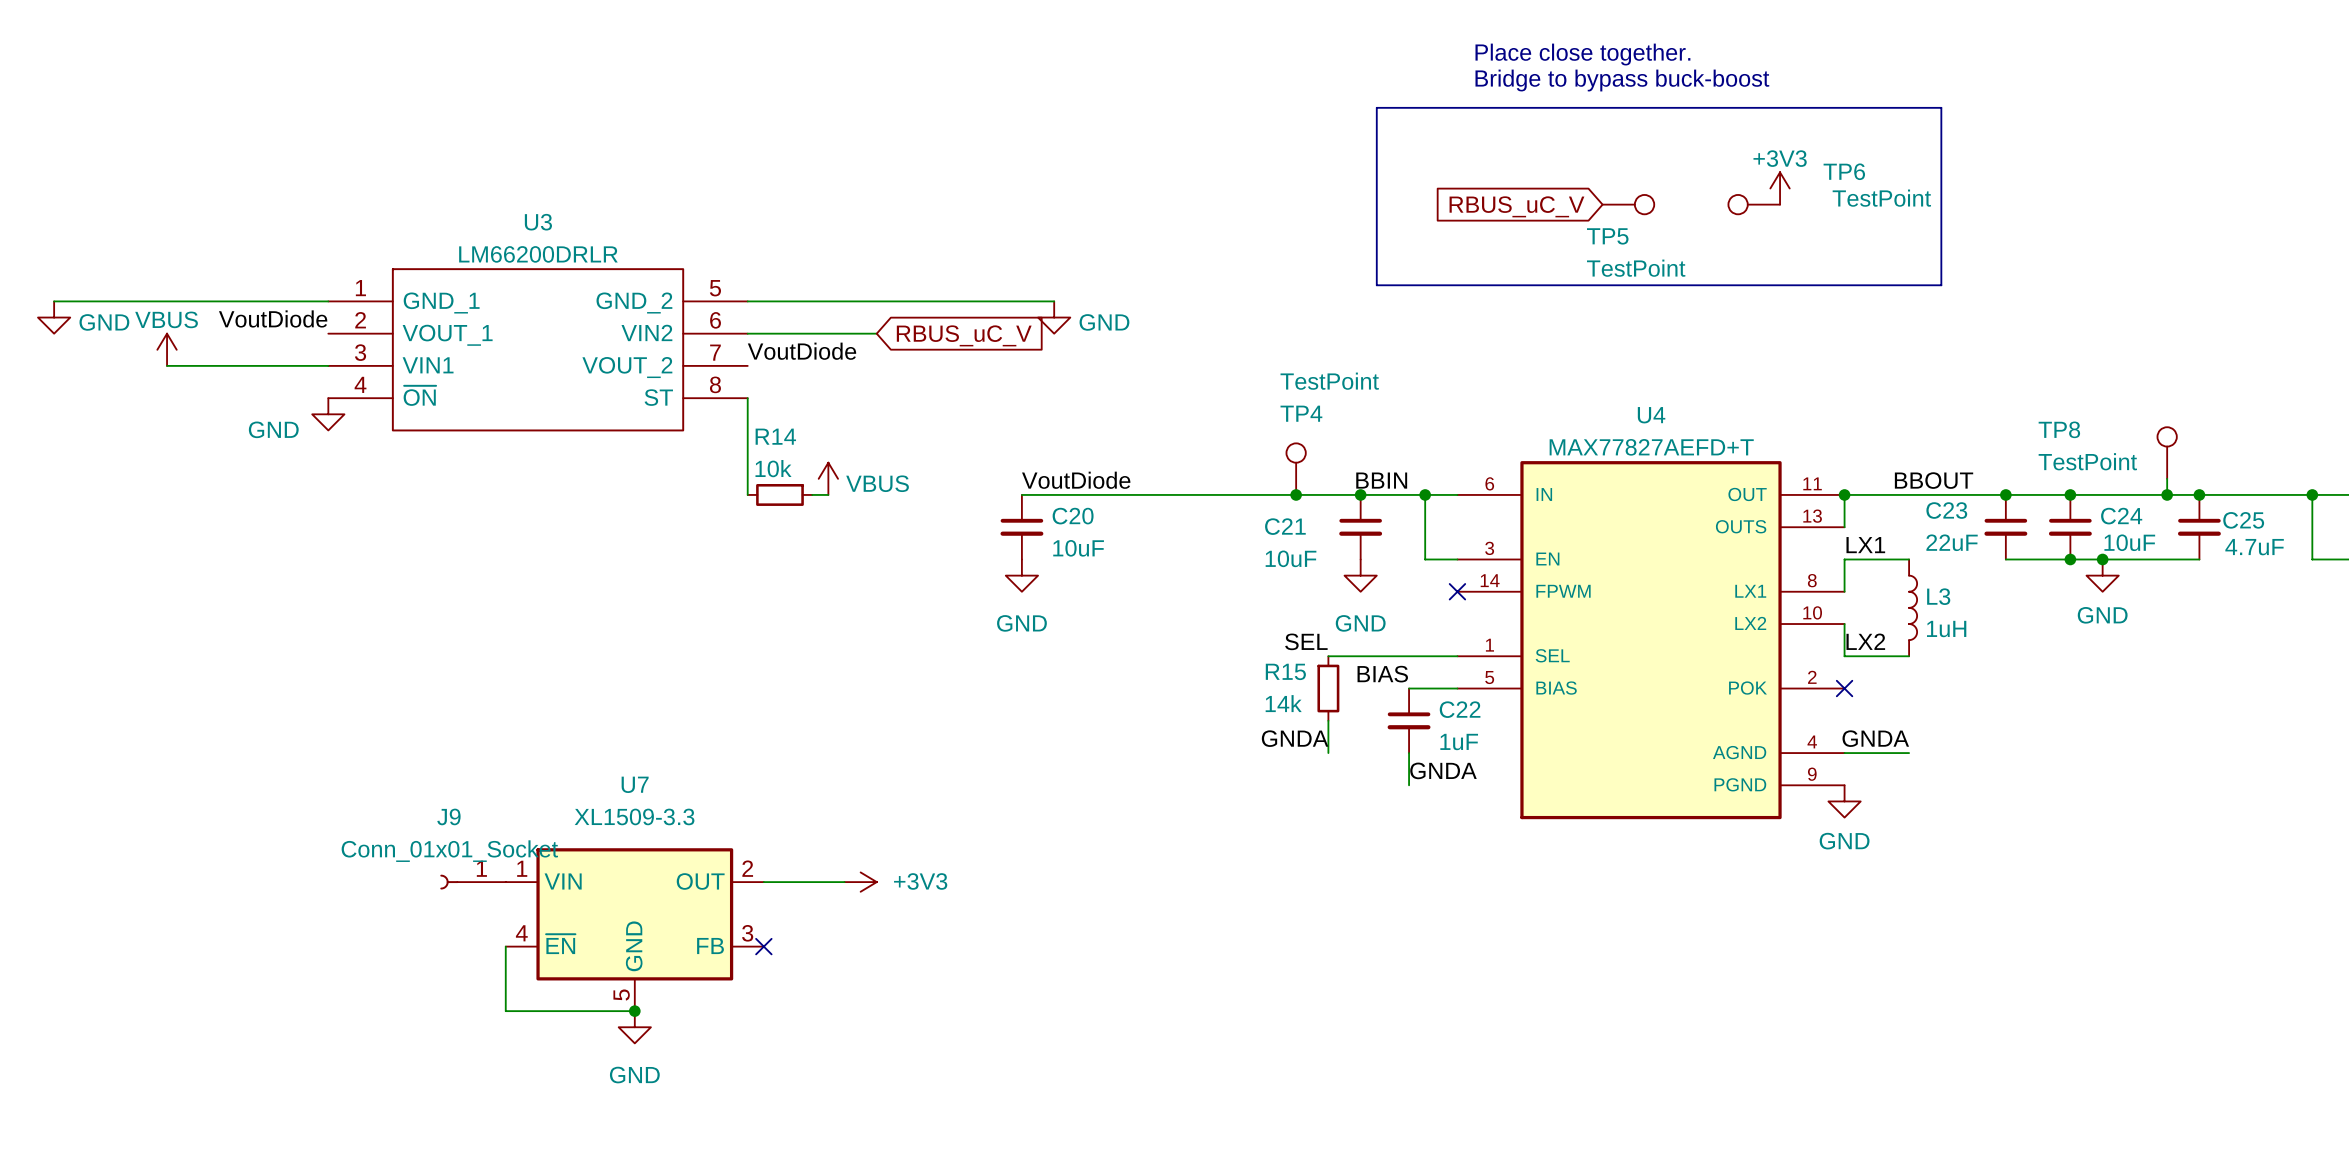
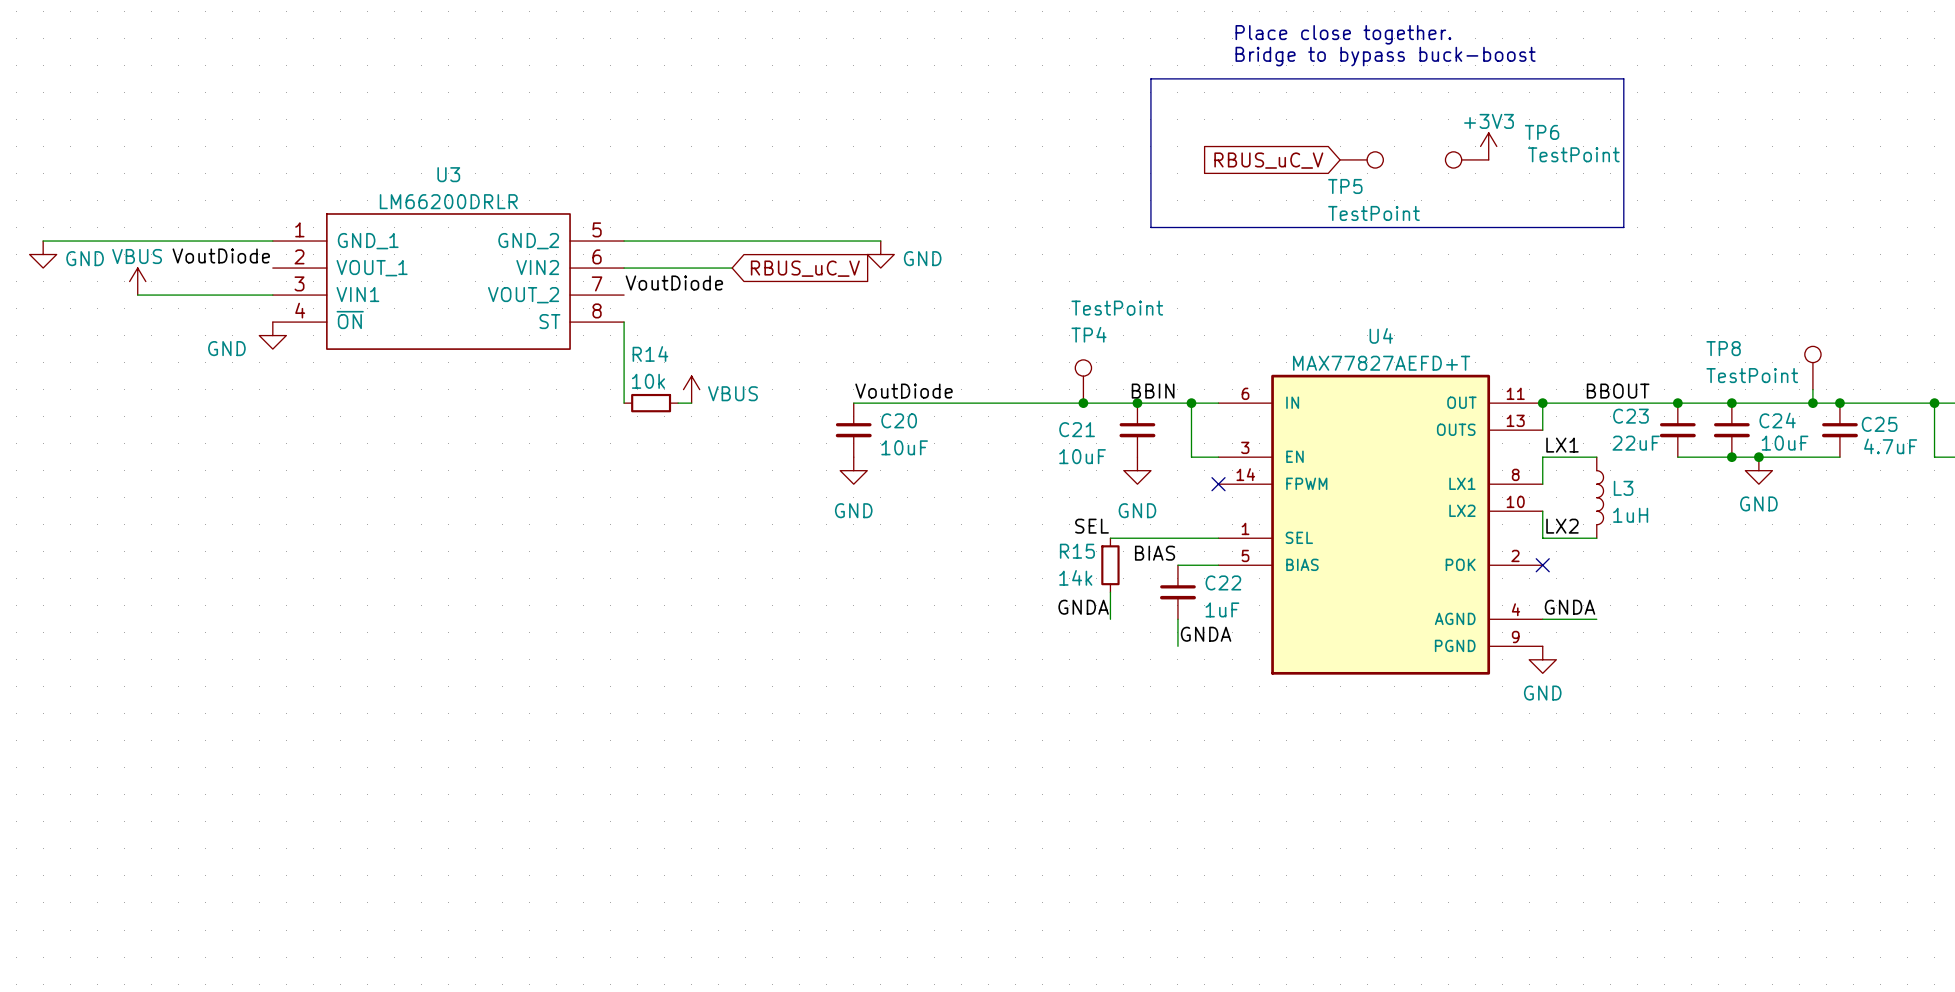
J9: Conn_01x01_Socket (473, 882) -> none
wire: (763, 882) (844, 882) -> none
power symbol: +3V3 (860, 882) -> none
U7: XL1509-3.3 (634, 929) -> none
wire: (505, 946) (505, 1011) (634, 1011) -> none
no-connect mark: (763, 946) -> none
junction: (634, 1011) -> none
power symbol: GND (634, 1027) -> none

